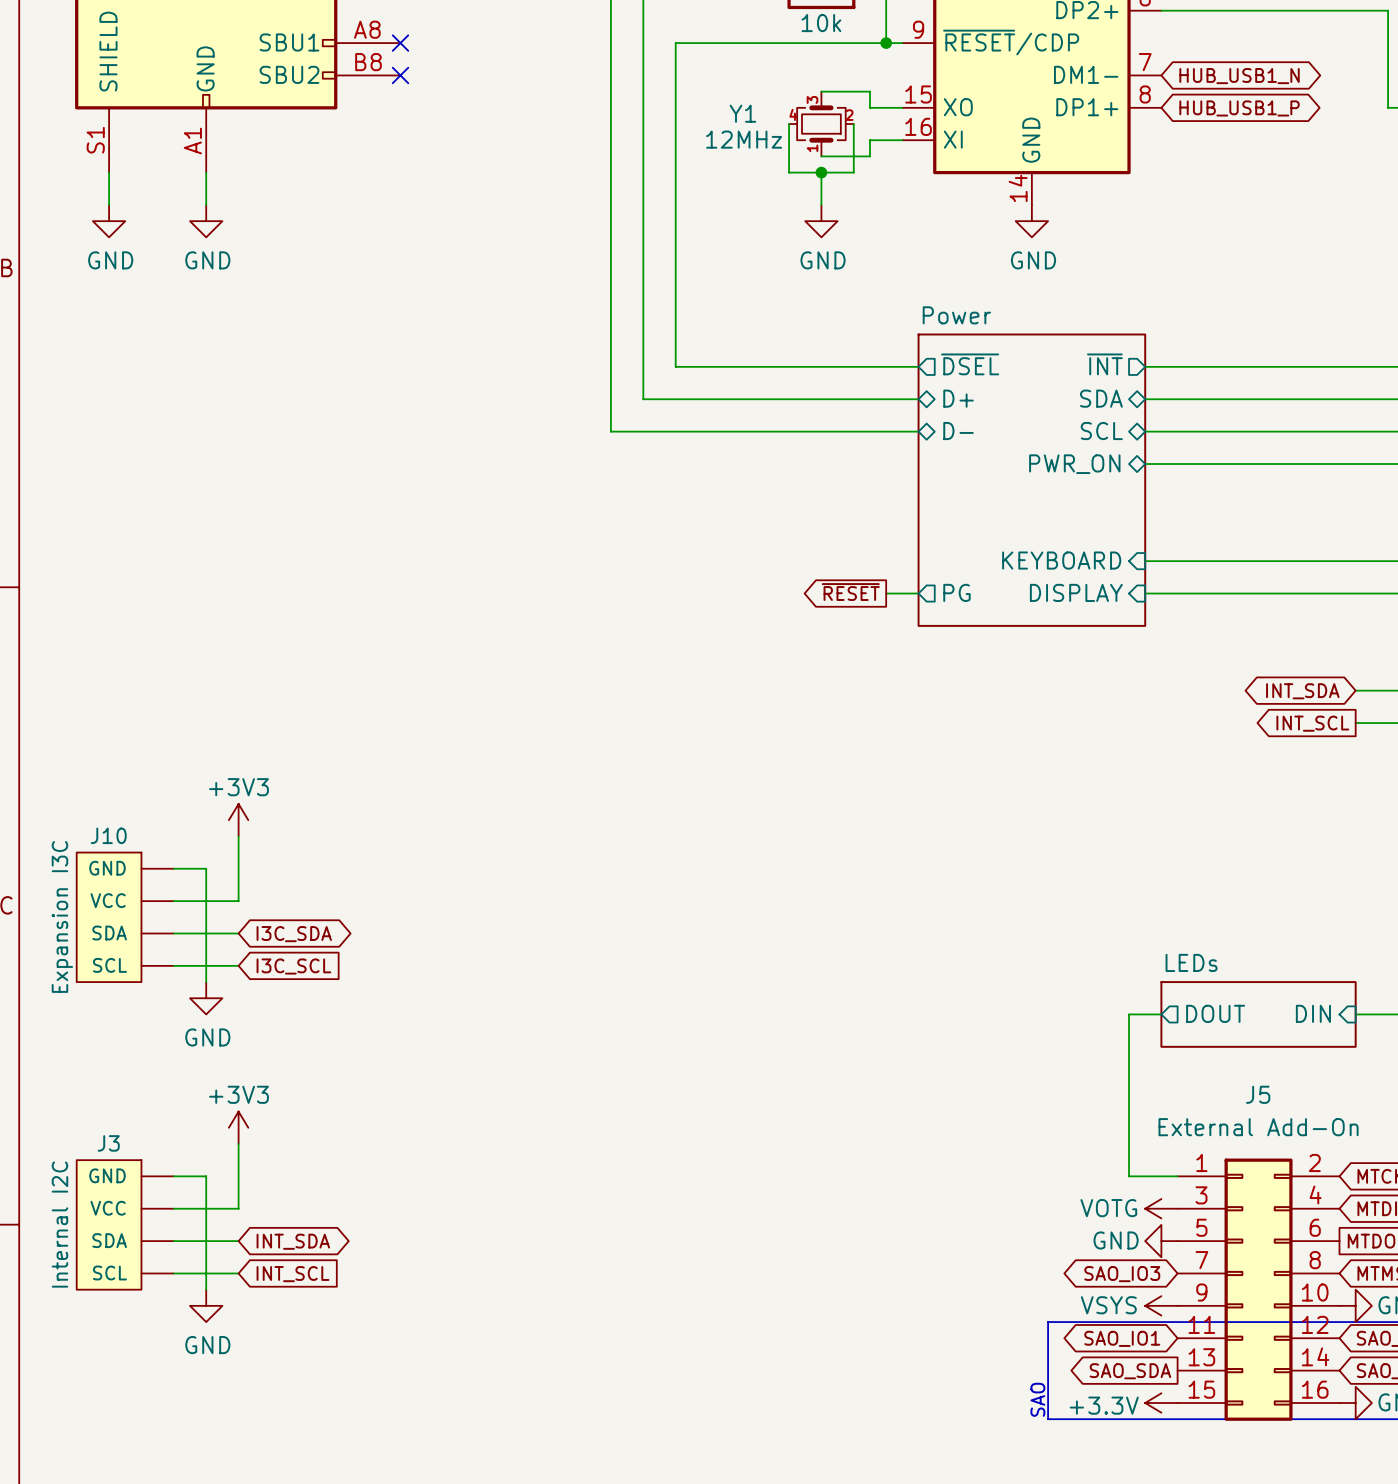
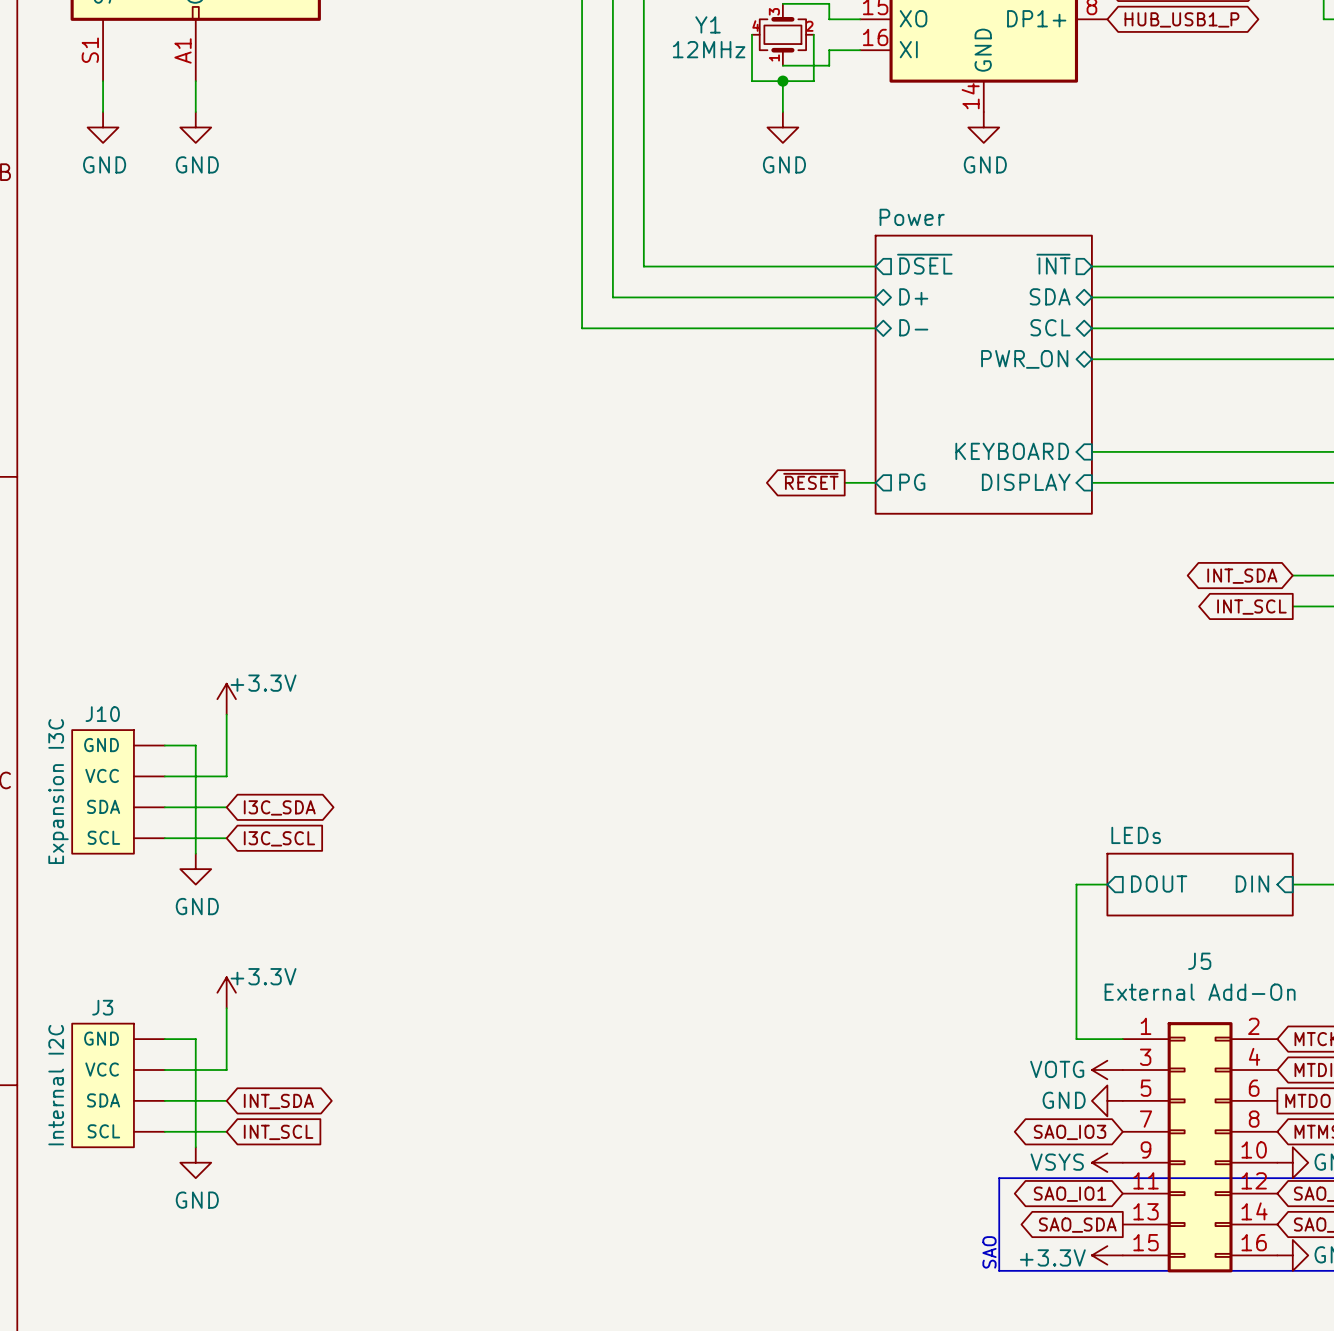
power symbol: +3V3 (238, 820) -> +3.3V (226, 699)
power symbol: +3V3 (238, 1127) -> +3.3V (226, 992)

